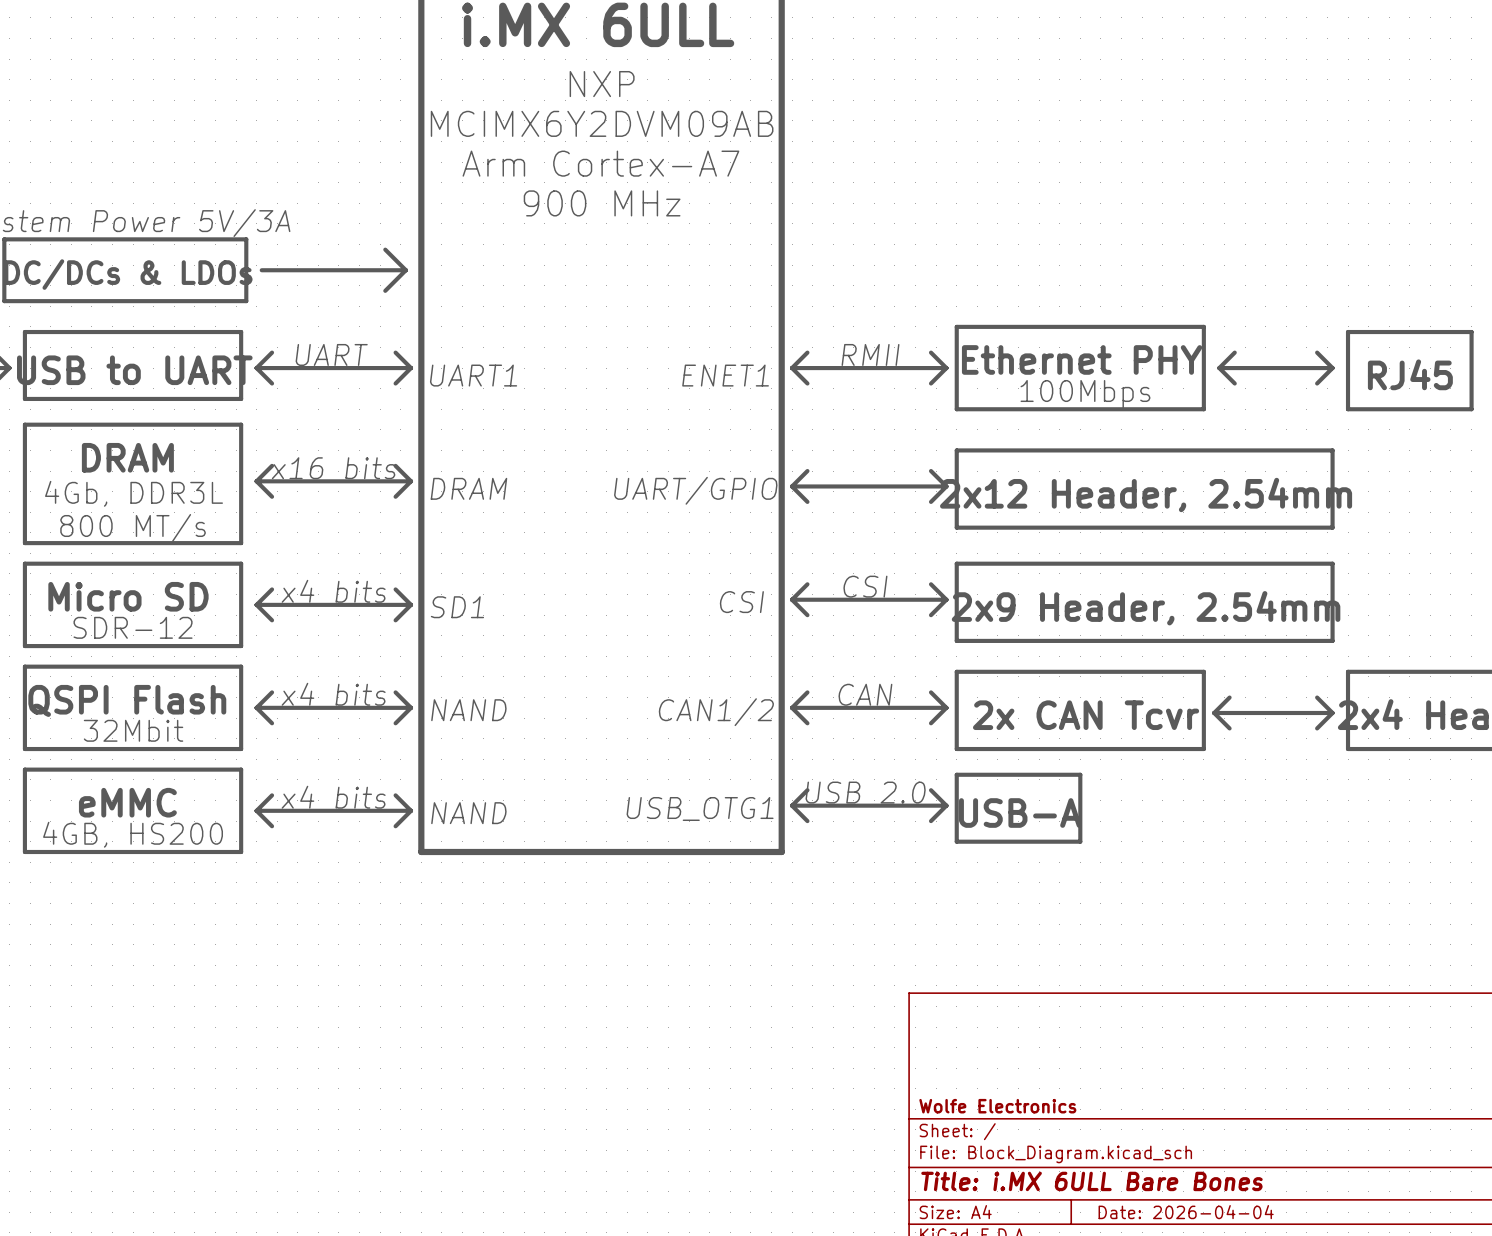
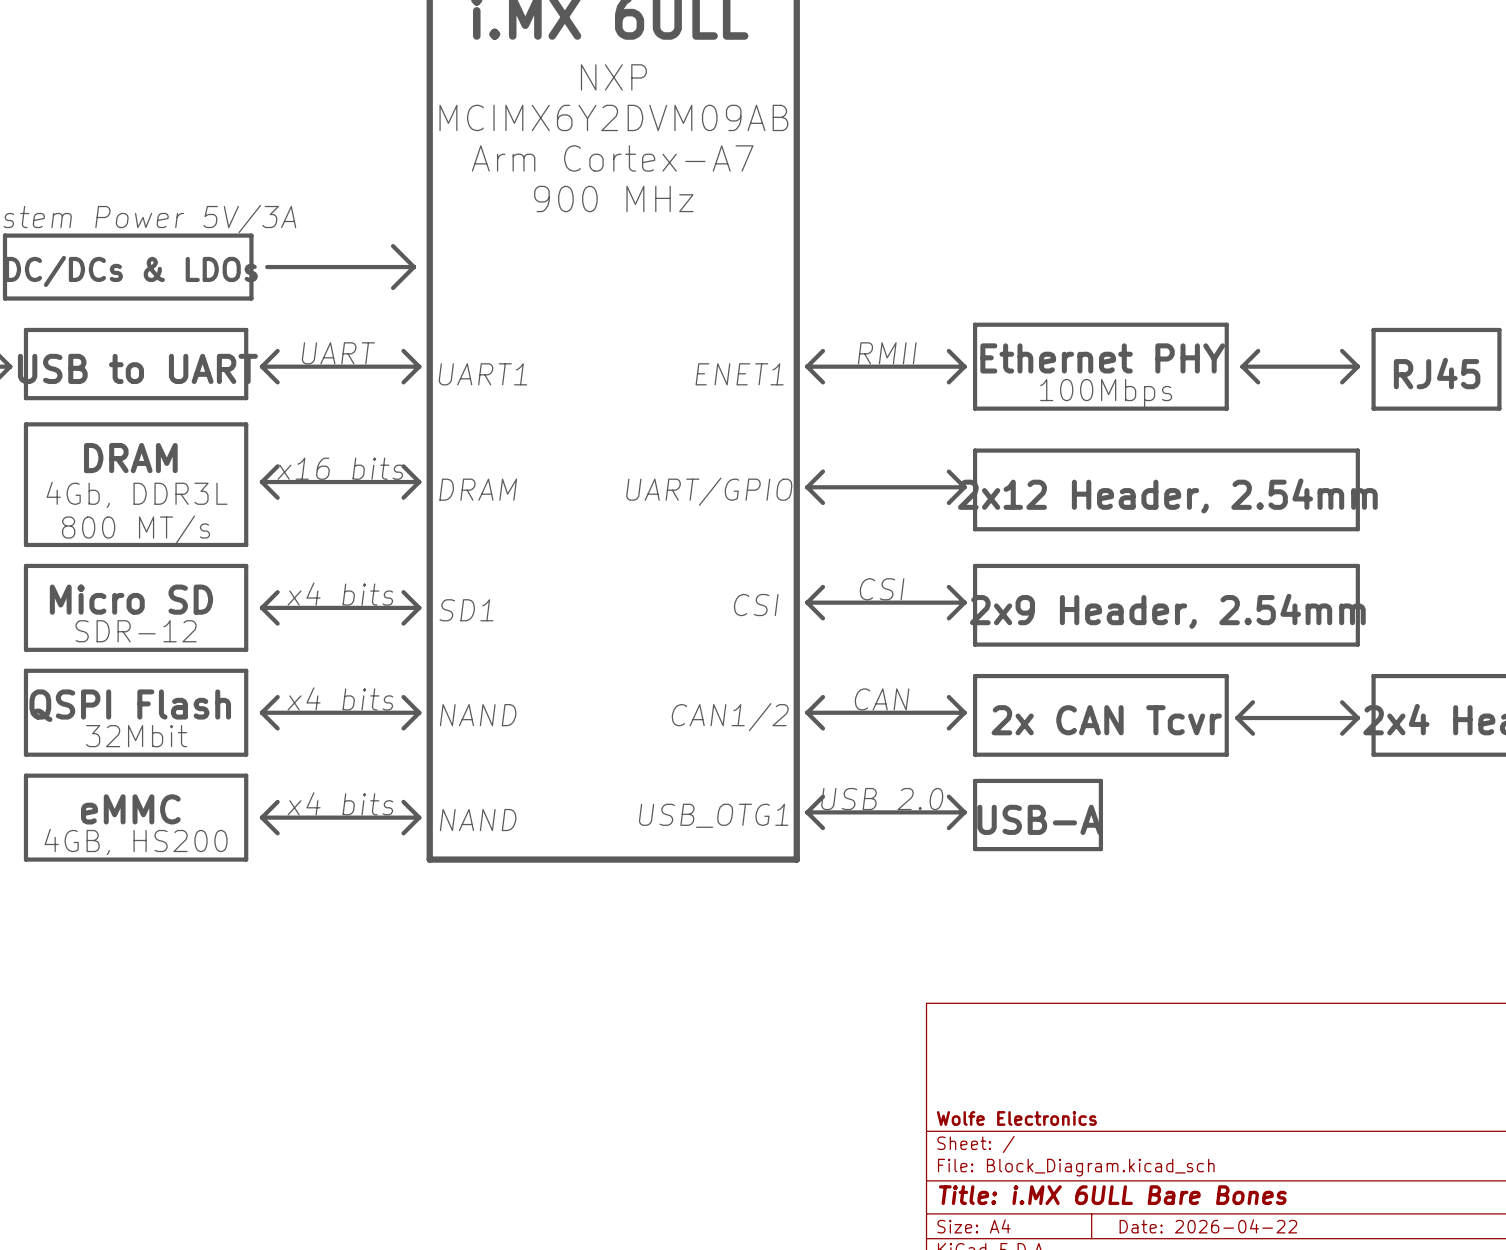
title block: Date: 2026-04-04 (1186, 1212) -> Date: 2026-04-22 (1208, 1226)

